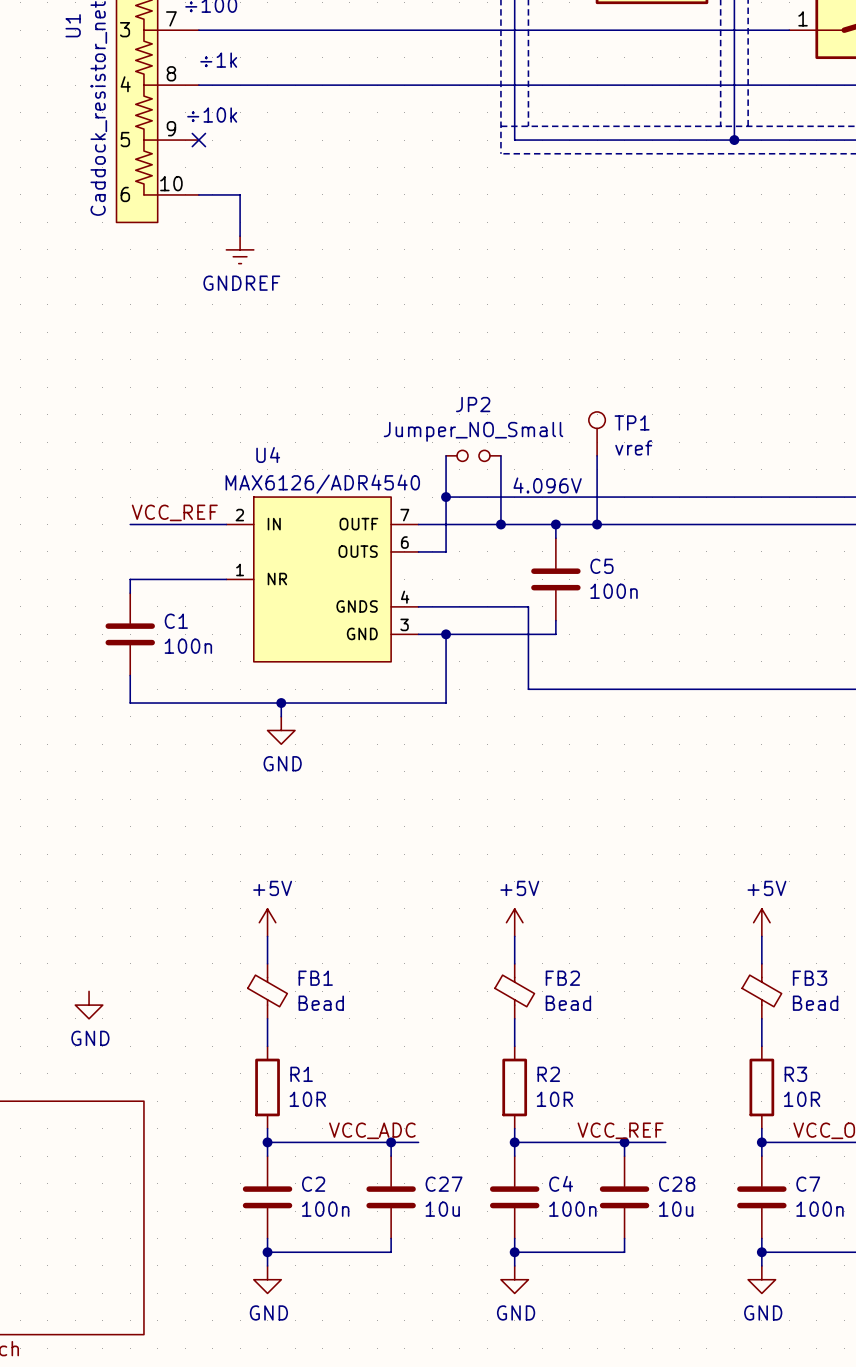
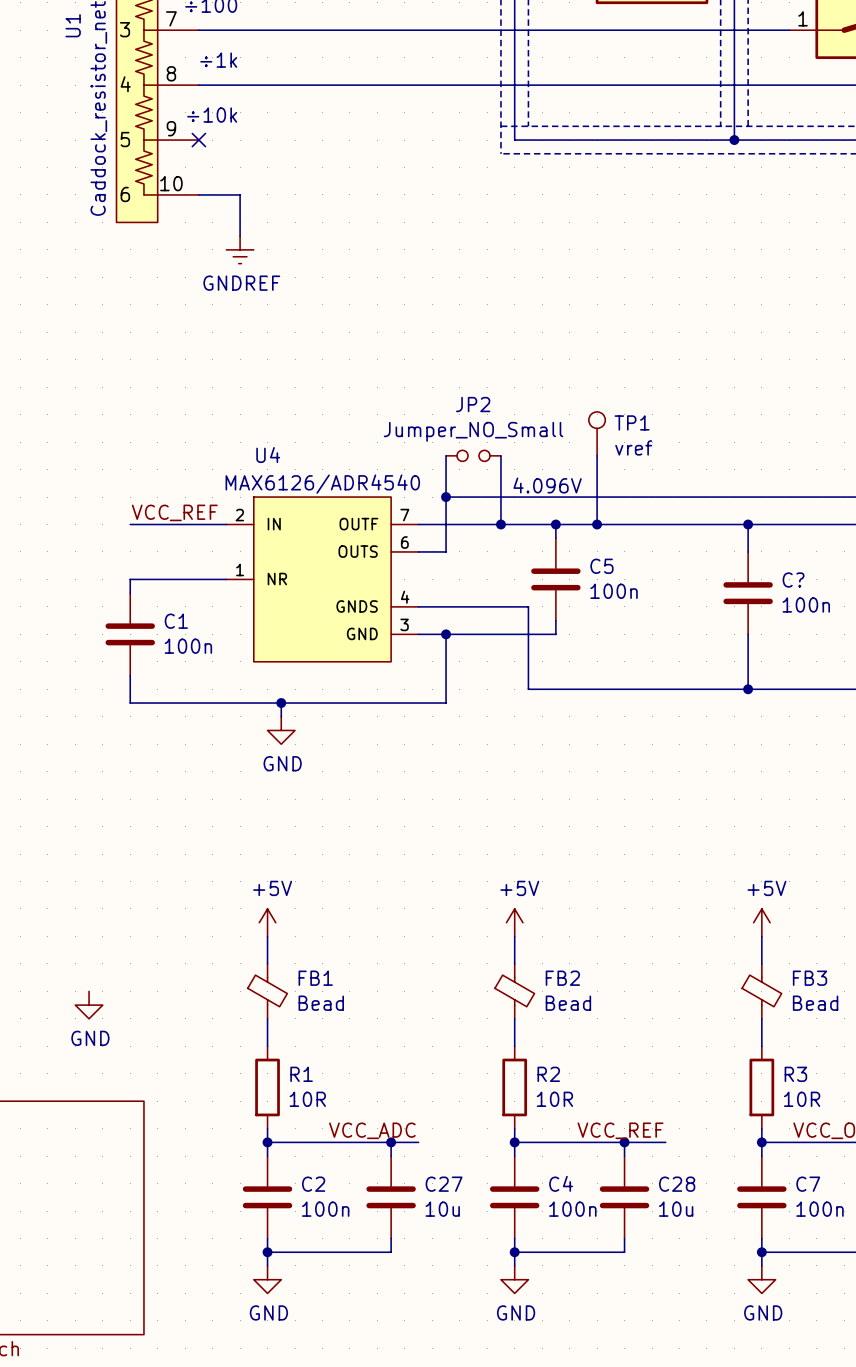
wire: none -> (748, 524) (748, 551)
junction: none -> (748, 524)
C?: none -> 100n (748, 593)
wire: none -> (748, 634) (748, 689)
junction: none -> (748, 689)

